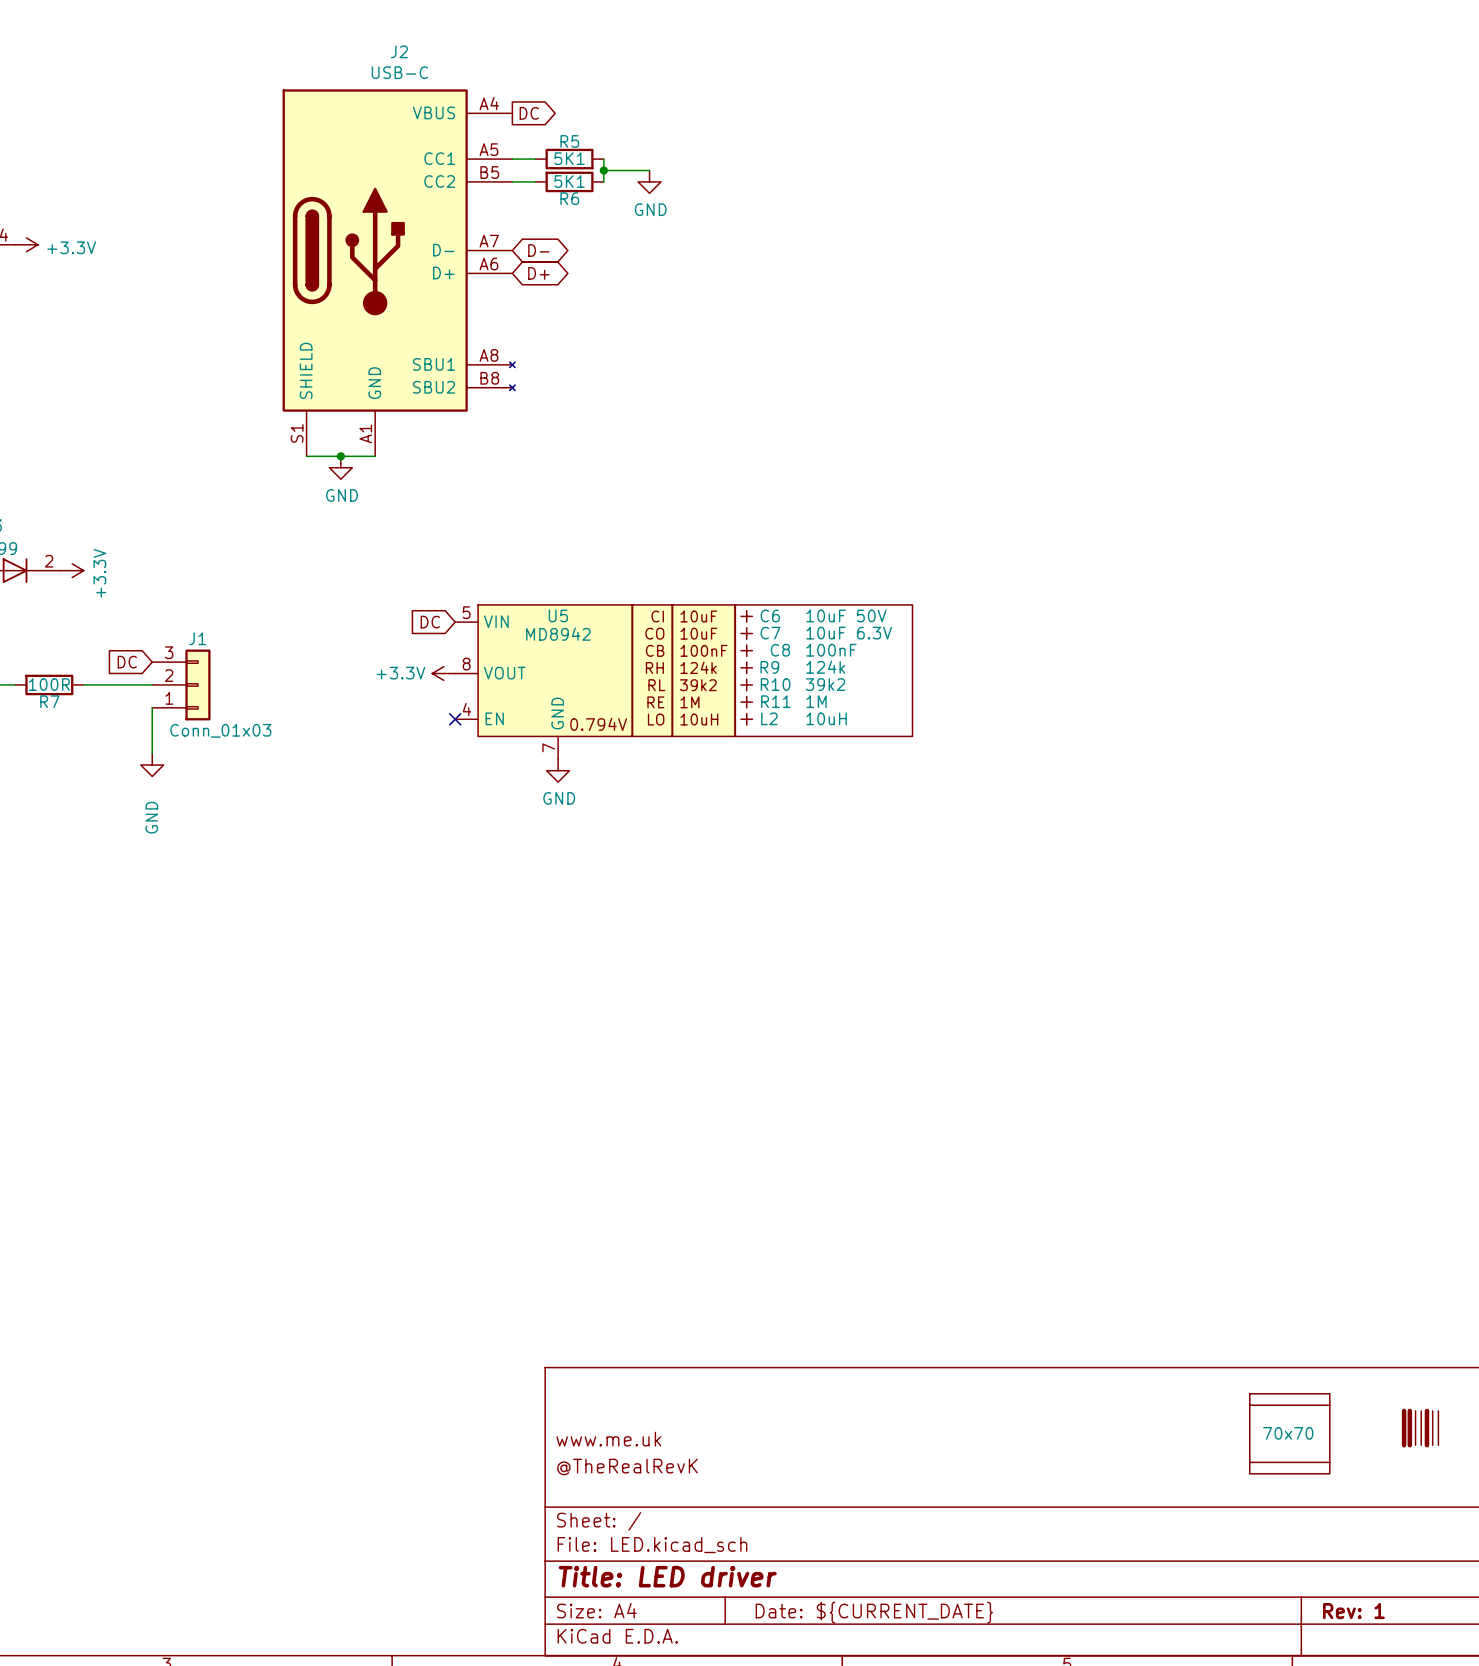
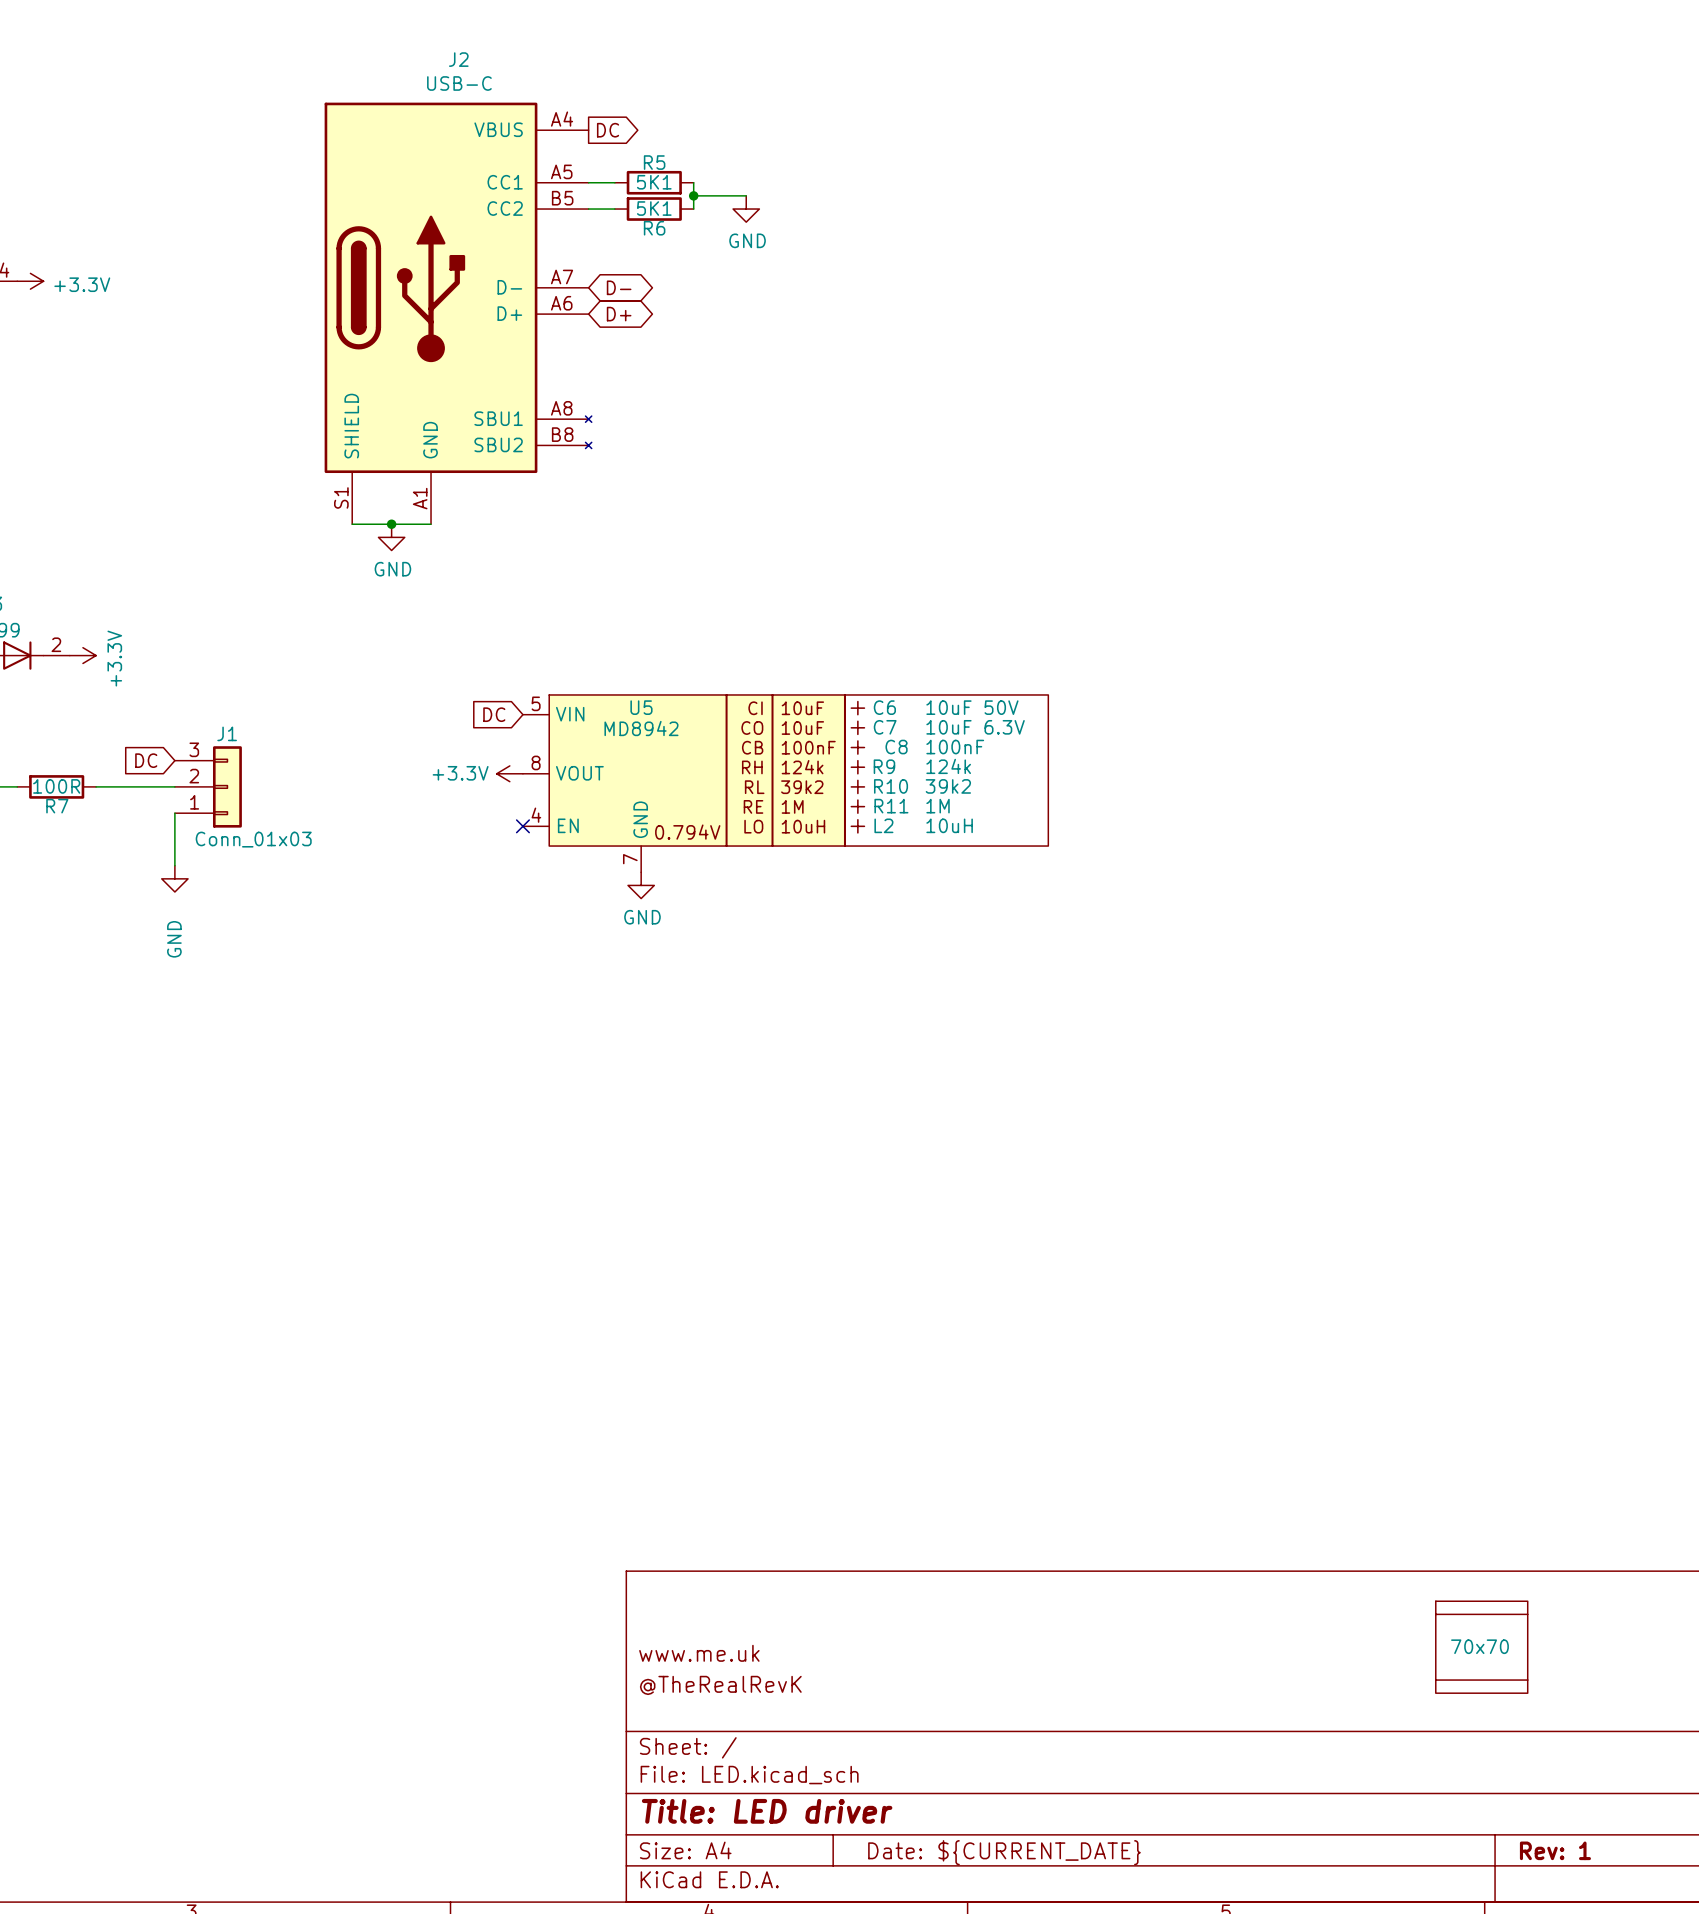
part: (1420, 1428) -> none

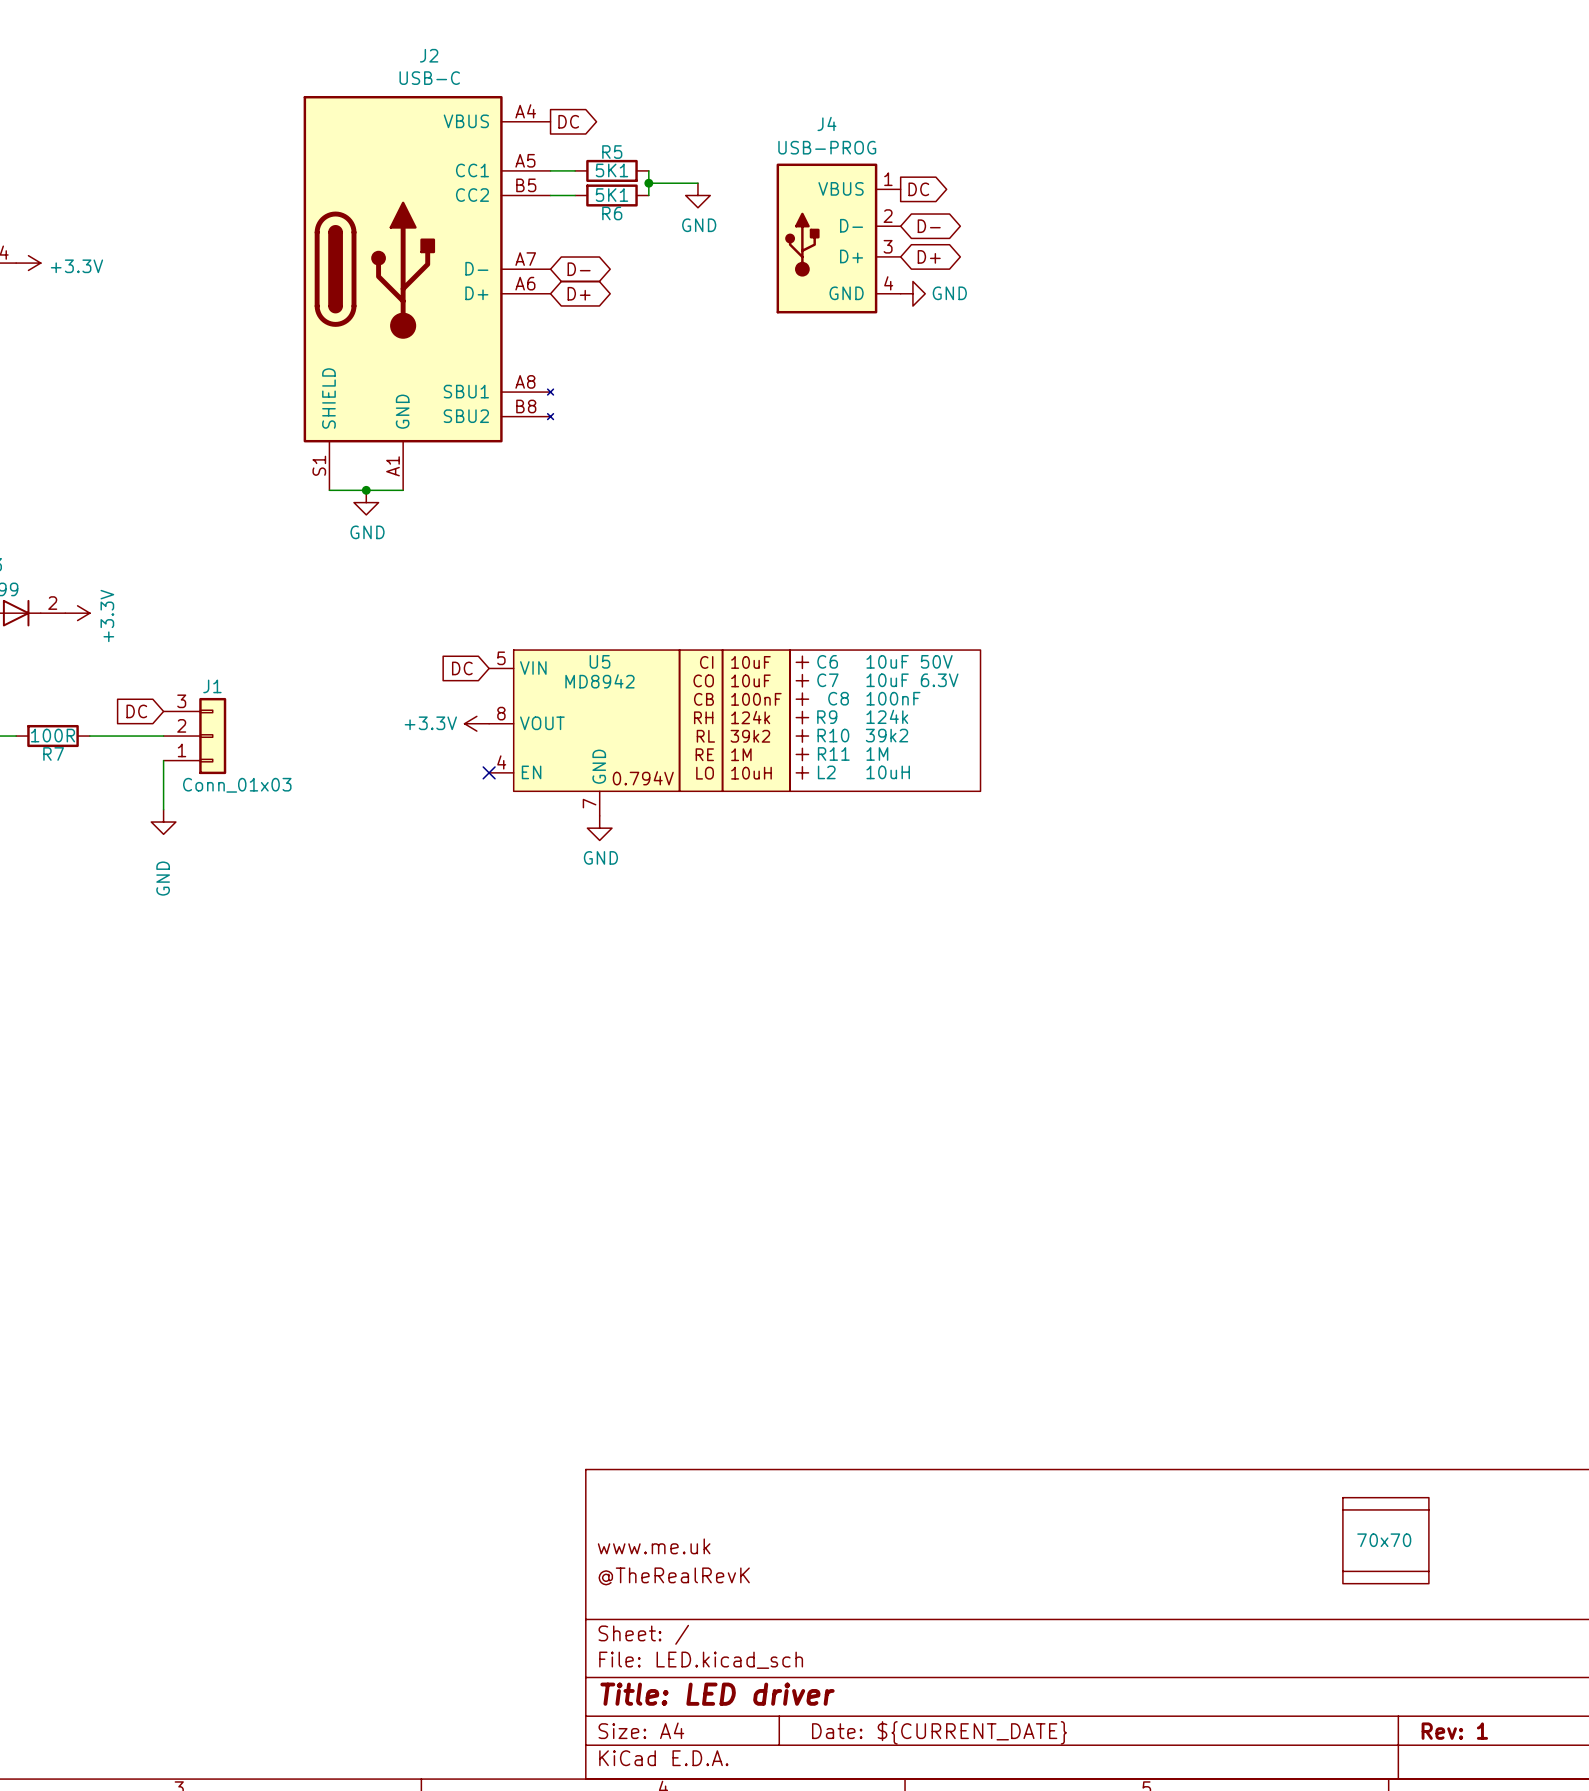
global label: none -> DC (918, 189)
global label: none -> D- (929, 226)
J4: none -> USB-PROG (838, 238)
global label: none -> D+ (929, 256)
power symbol: none -> GND (912, 293)

